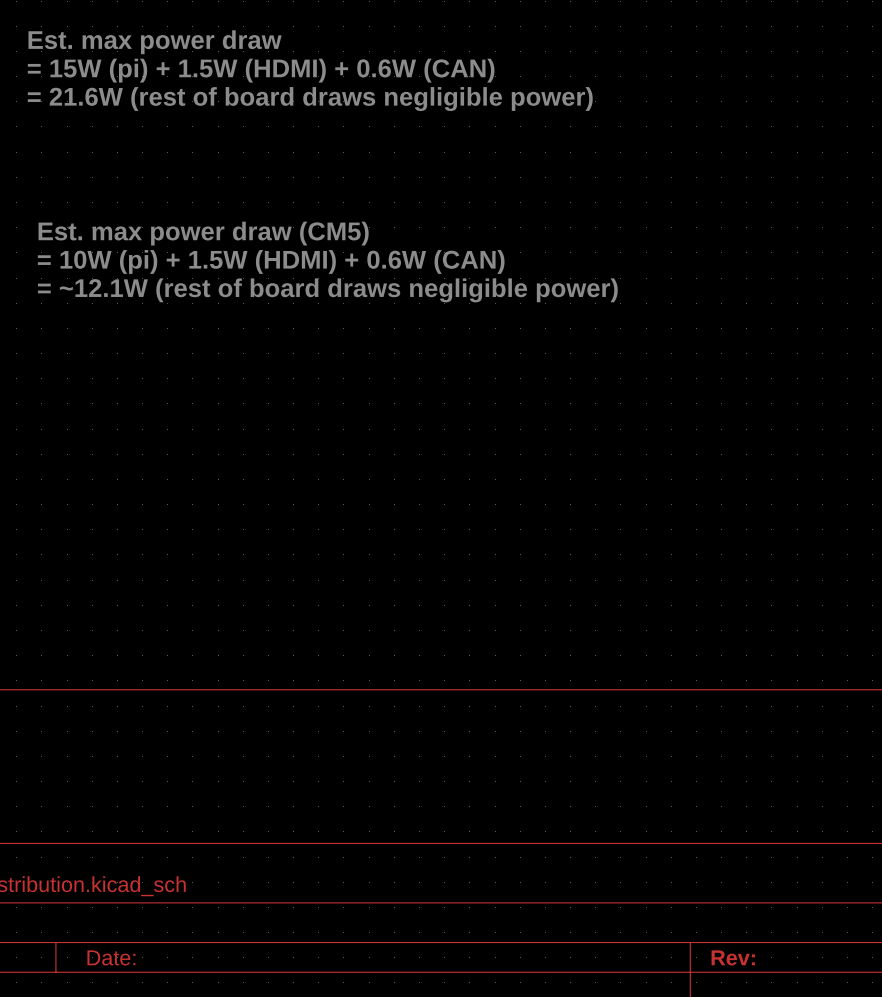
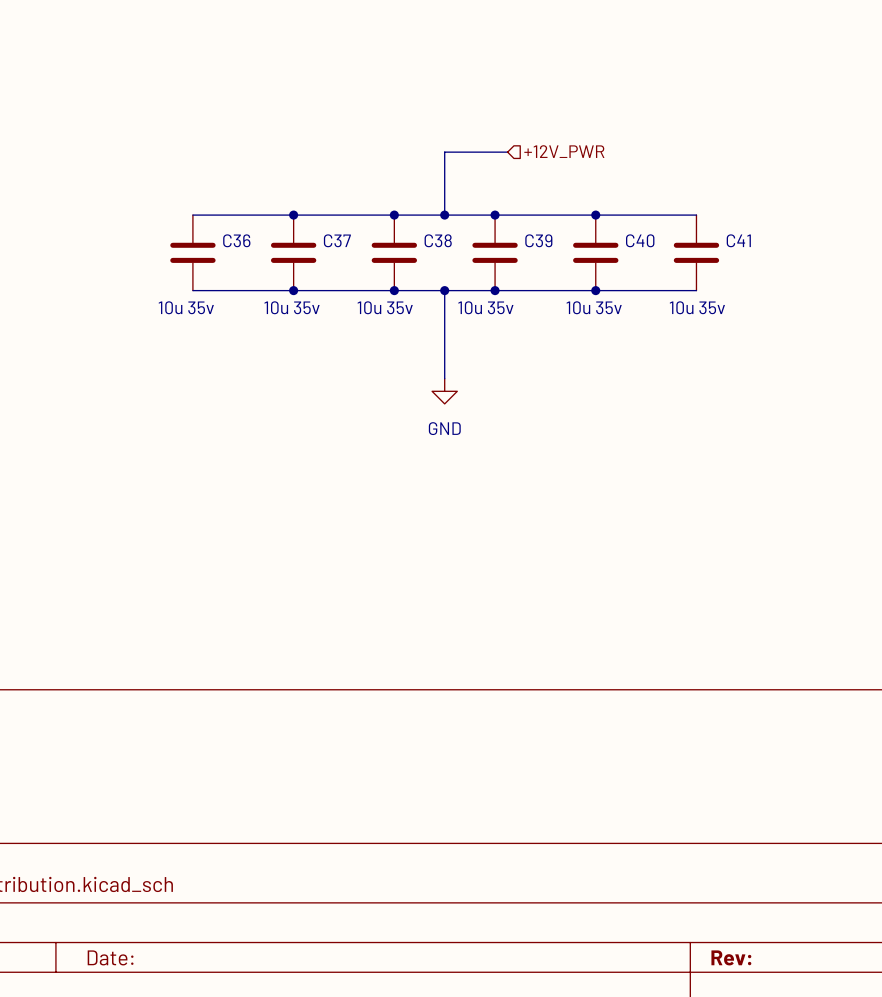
text: Est. max power draw (155, 42) -> none
text: = 15W (pi) + 1.5W (HDMI) + 0.6W (CAN) (261, 70) -> none
text: = 21.6W (rest of board draws negligible power) (310, 99) -> none
wire: none -> (507, 152) (444, 152) (444, 215)
hierarchical label: none -> +12V_PWR (564, 151)
wire: none -> (192, 215) (696, 215)
junction: none -> (293, 215)
junction: none -> (394, 215)
junction: none -> (444, 215)
junction: none -> (495, 215)
junction: none -> (595, 215)
text: Est. max power draw (CM5) (203, 233) -> none
C36: none -> 10u 35v (192, 252)
C37: none -> 10u 35v (293, 252)
C38: none -> 10u 35v (394, 252)
C39: none -> 10u 35v (495, 252)
C40: none -> 10u 35v (595, 252)
C41: none -> 10u 35v (696, 252)
text: = 10W (pi) + 1.5W (HDMI) + 0.6W (CAN) (271, 261) -> none
wire: none -> (192, 290) (696, 290)
junction: none -> (293, 290)
text: = ~12.1W (rest of board draws negligible power) (327, 290) -> none
junction: none -> (394, 290)
wire: none -> (444, 290) (444, 378)
junction: none -> (444, 290)
junction: none -> (495, 290)
junction: none -> (595, 290)
power symbol: none -> GND (444, 391)

